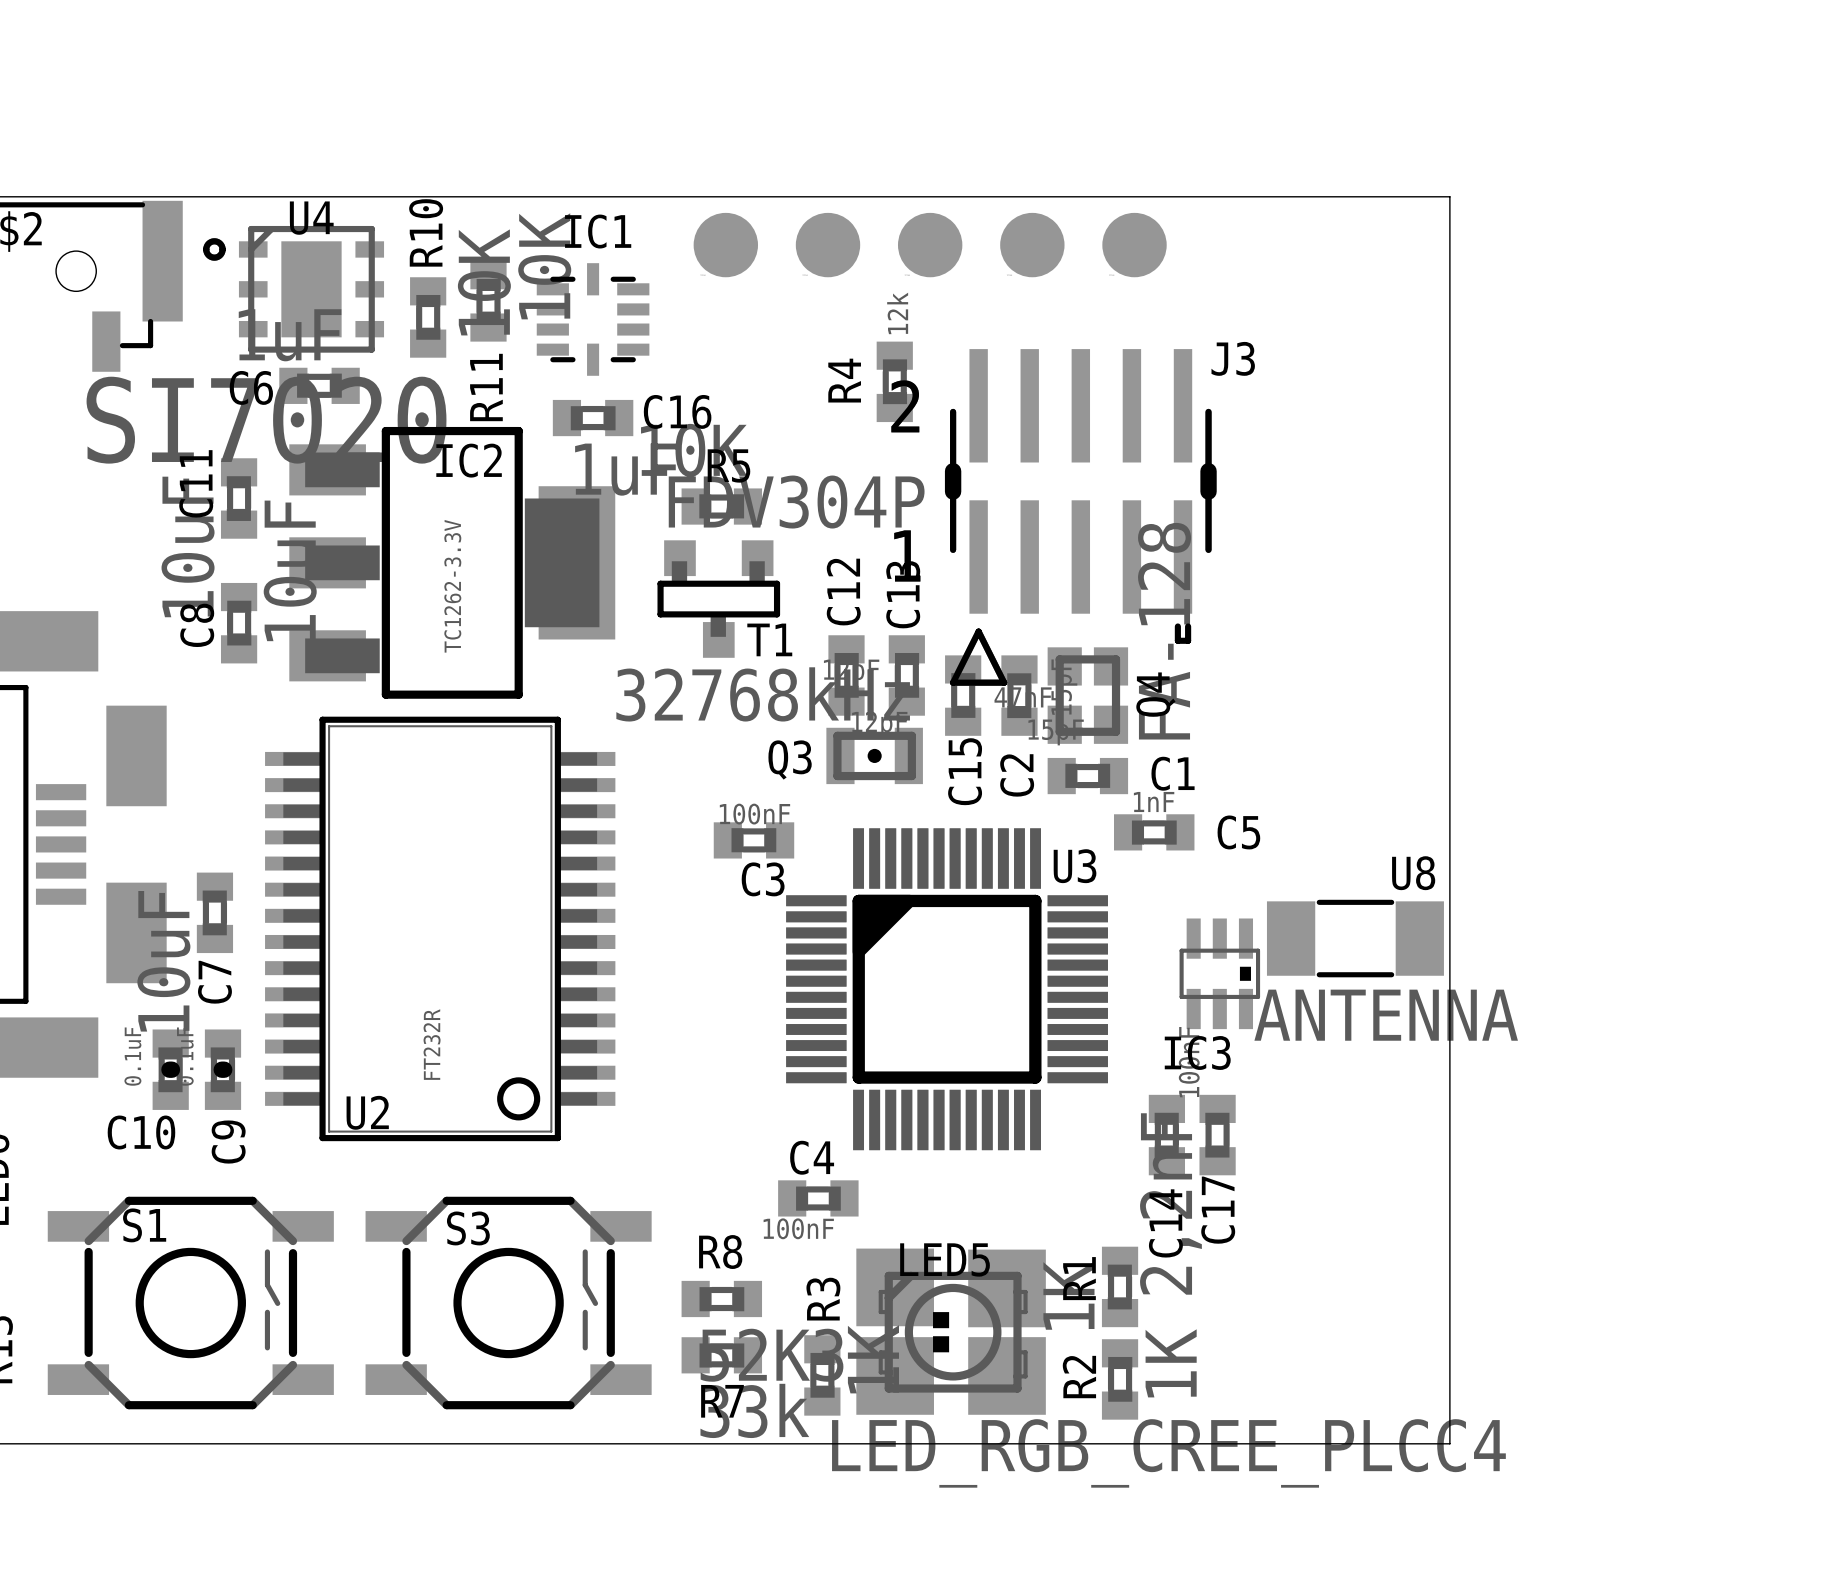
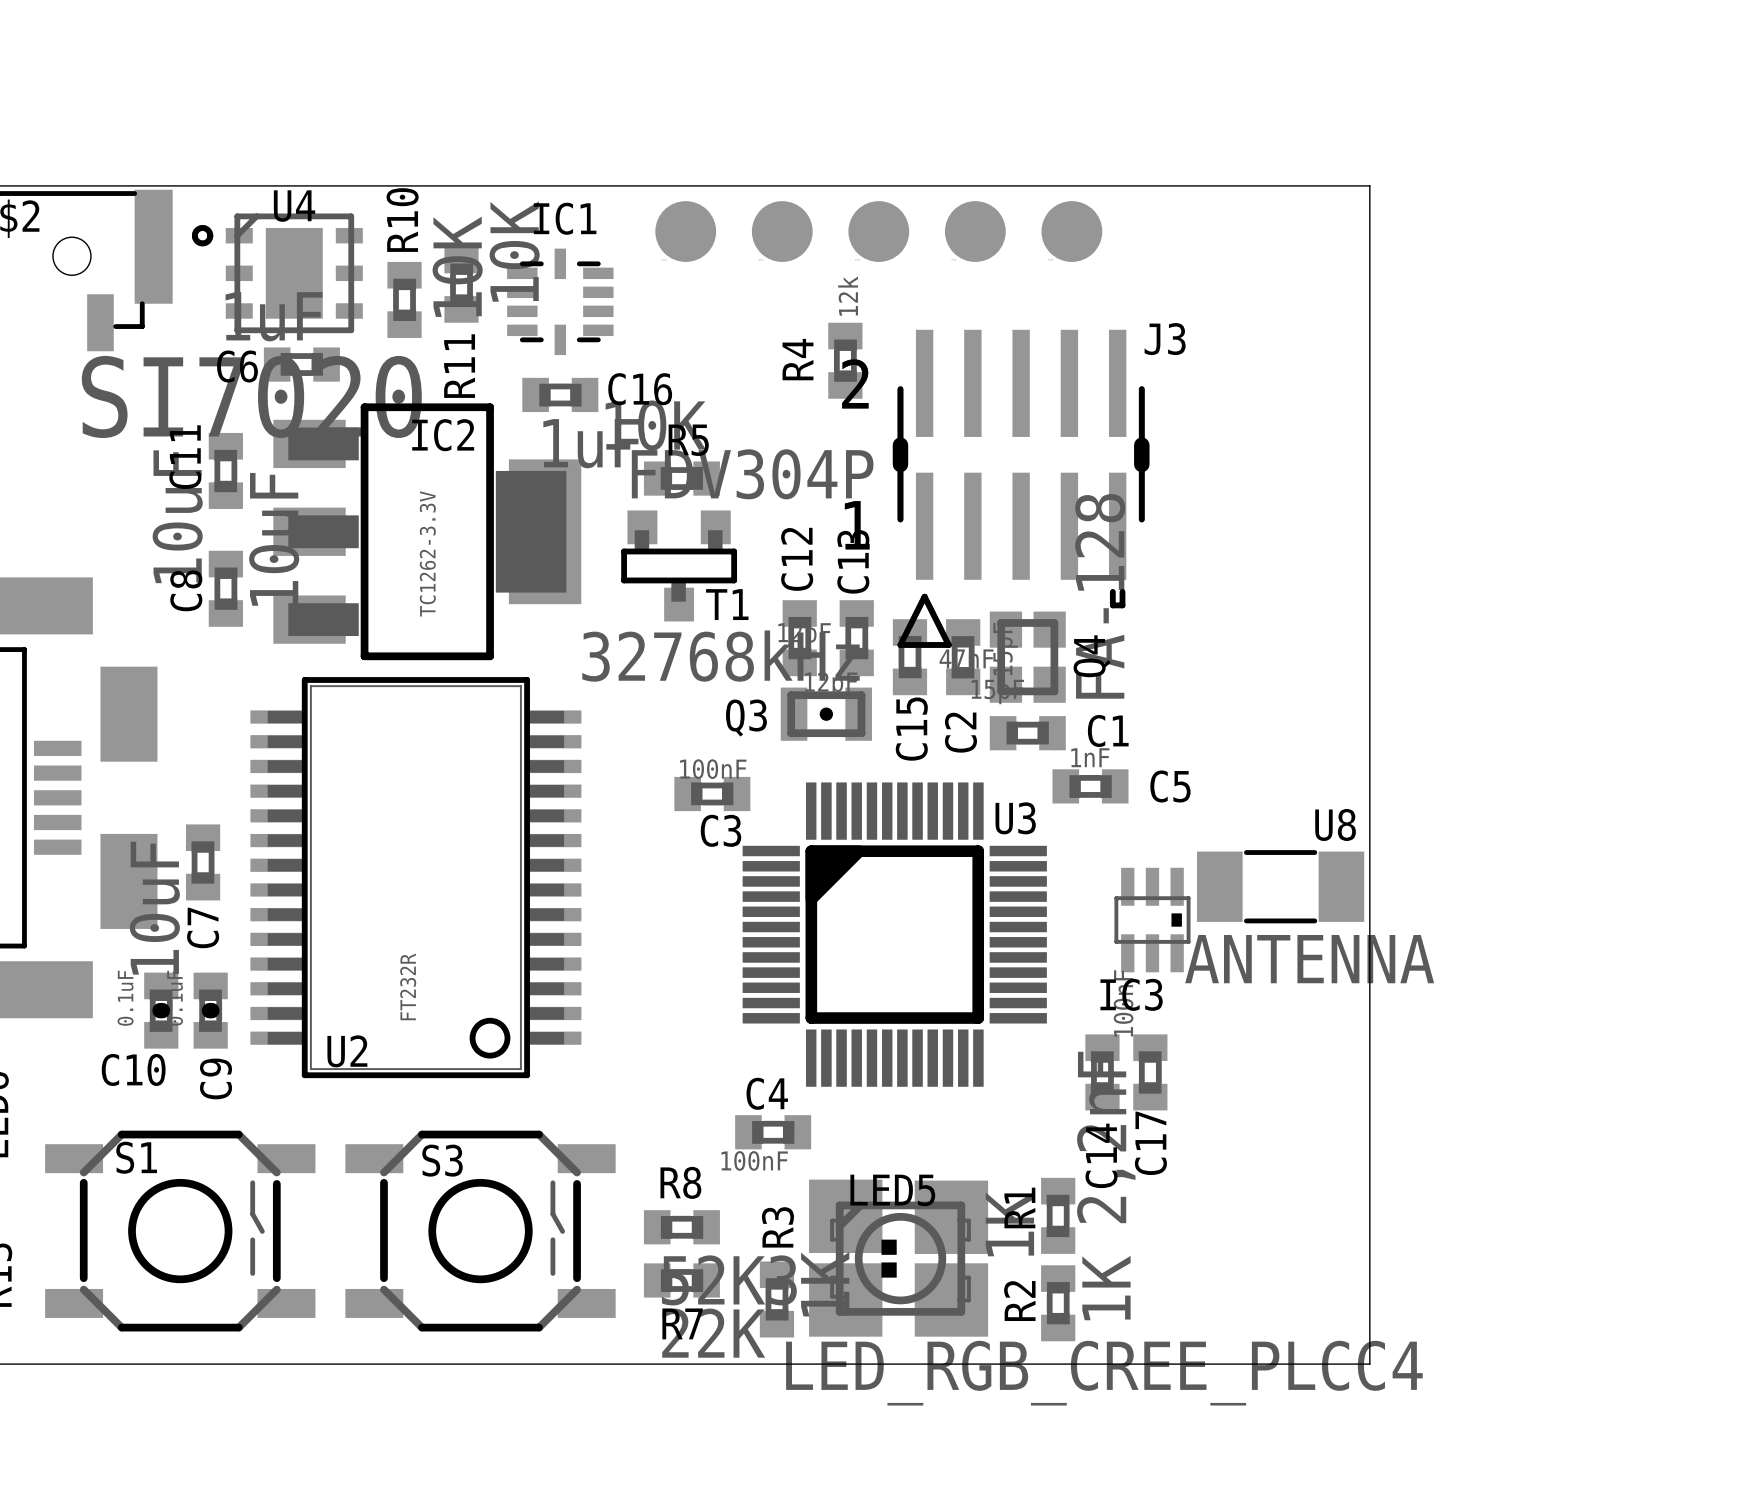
R7 value: 33k (754, 1410) -> 22K (713, 1333)

